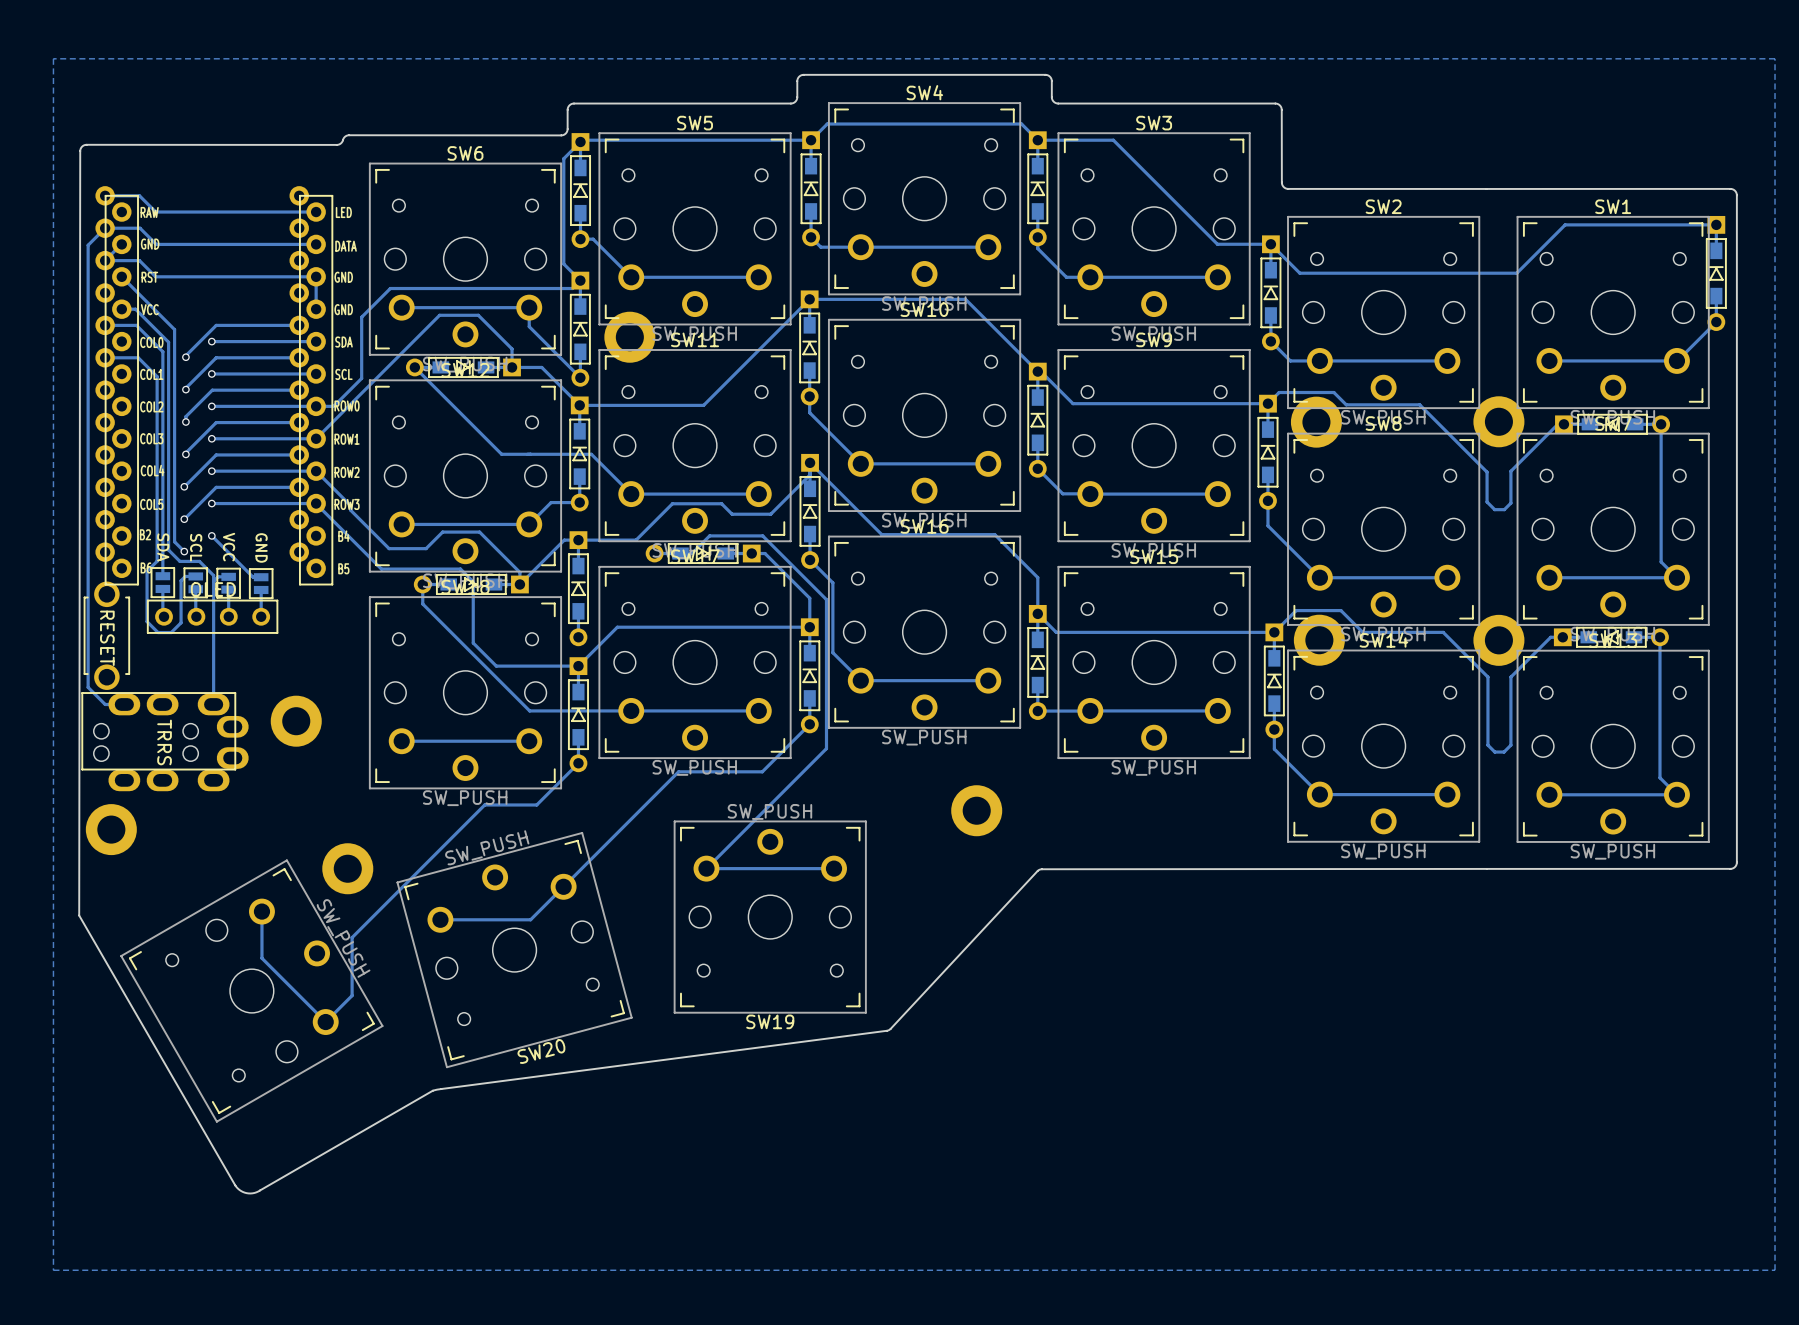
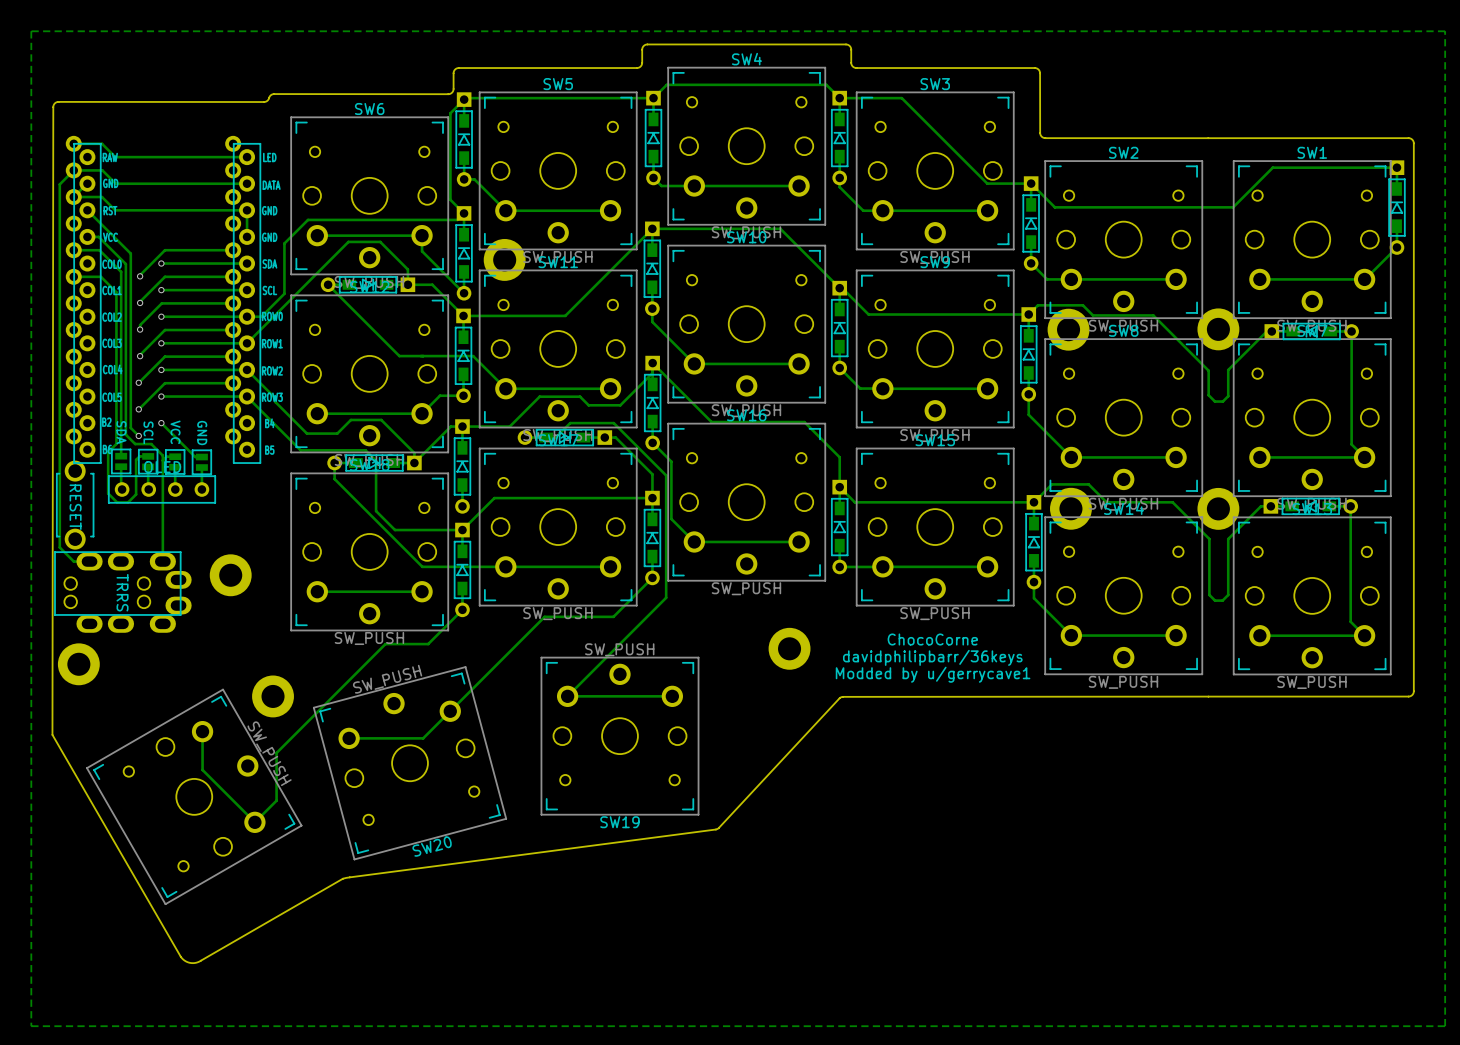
text: none -> ChocoCorne (932, 639)
text: none -> davidphilipbarr/36keys (932, 657)
text: none -> Modded by u/gerrycave1 (933, 674)

